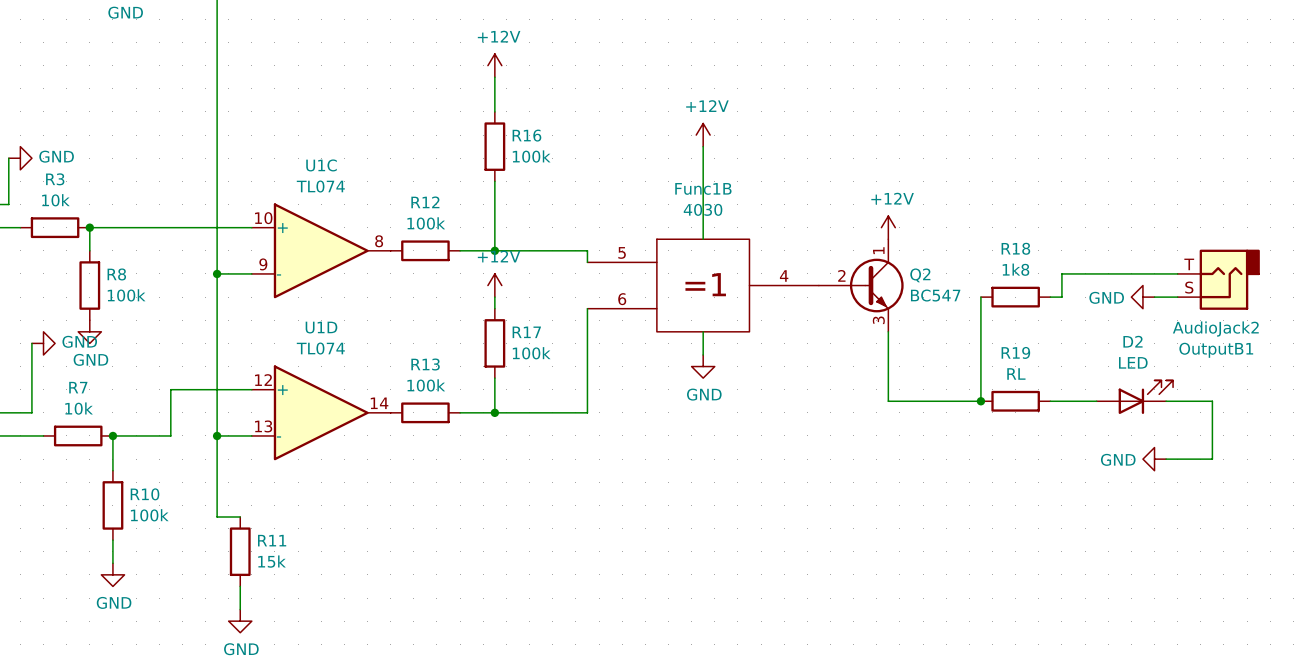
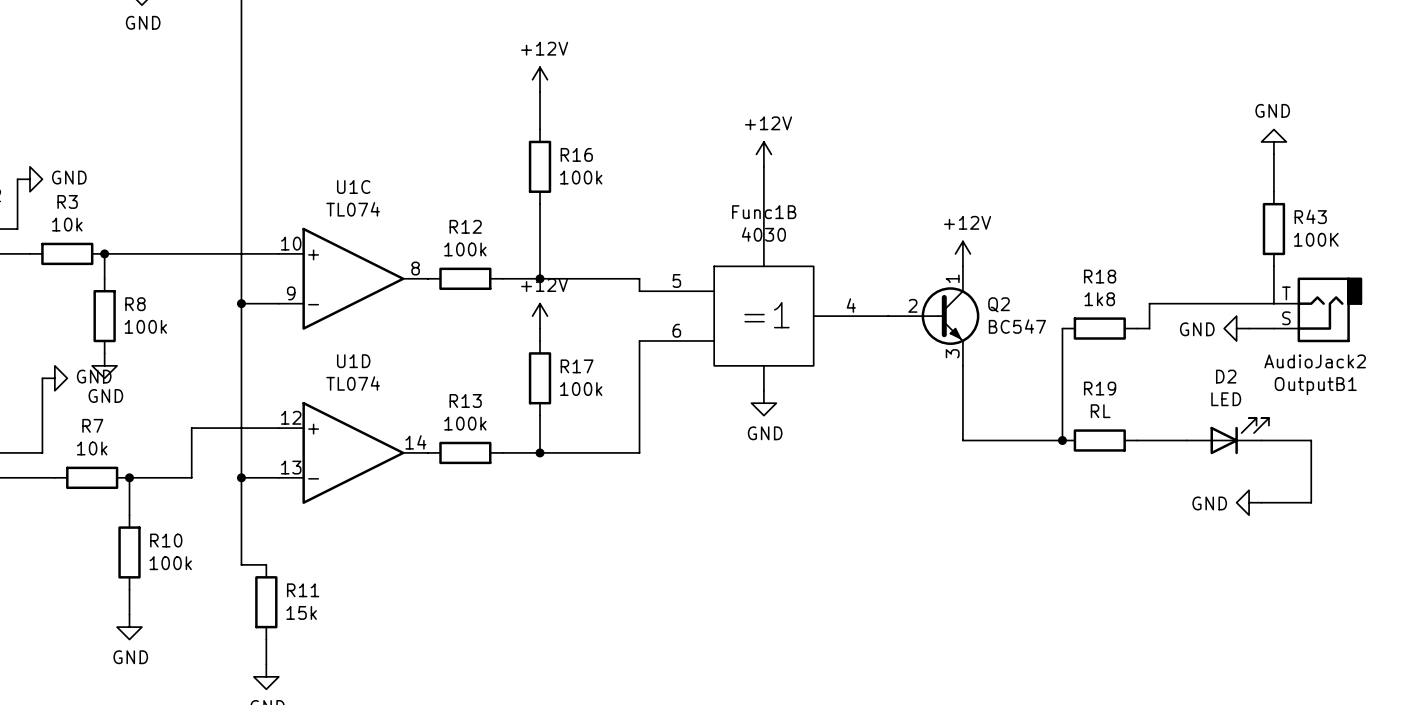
power symbol: none -> GND (1273, 141)
wire: none -> (1273, 154) (1273, 191)
R43: none -> 100K (1273, 229)
wire: none -> (1273, 266) (1273, 303)

